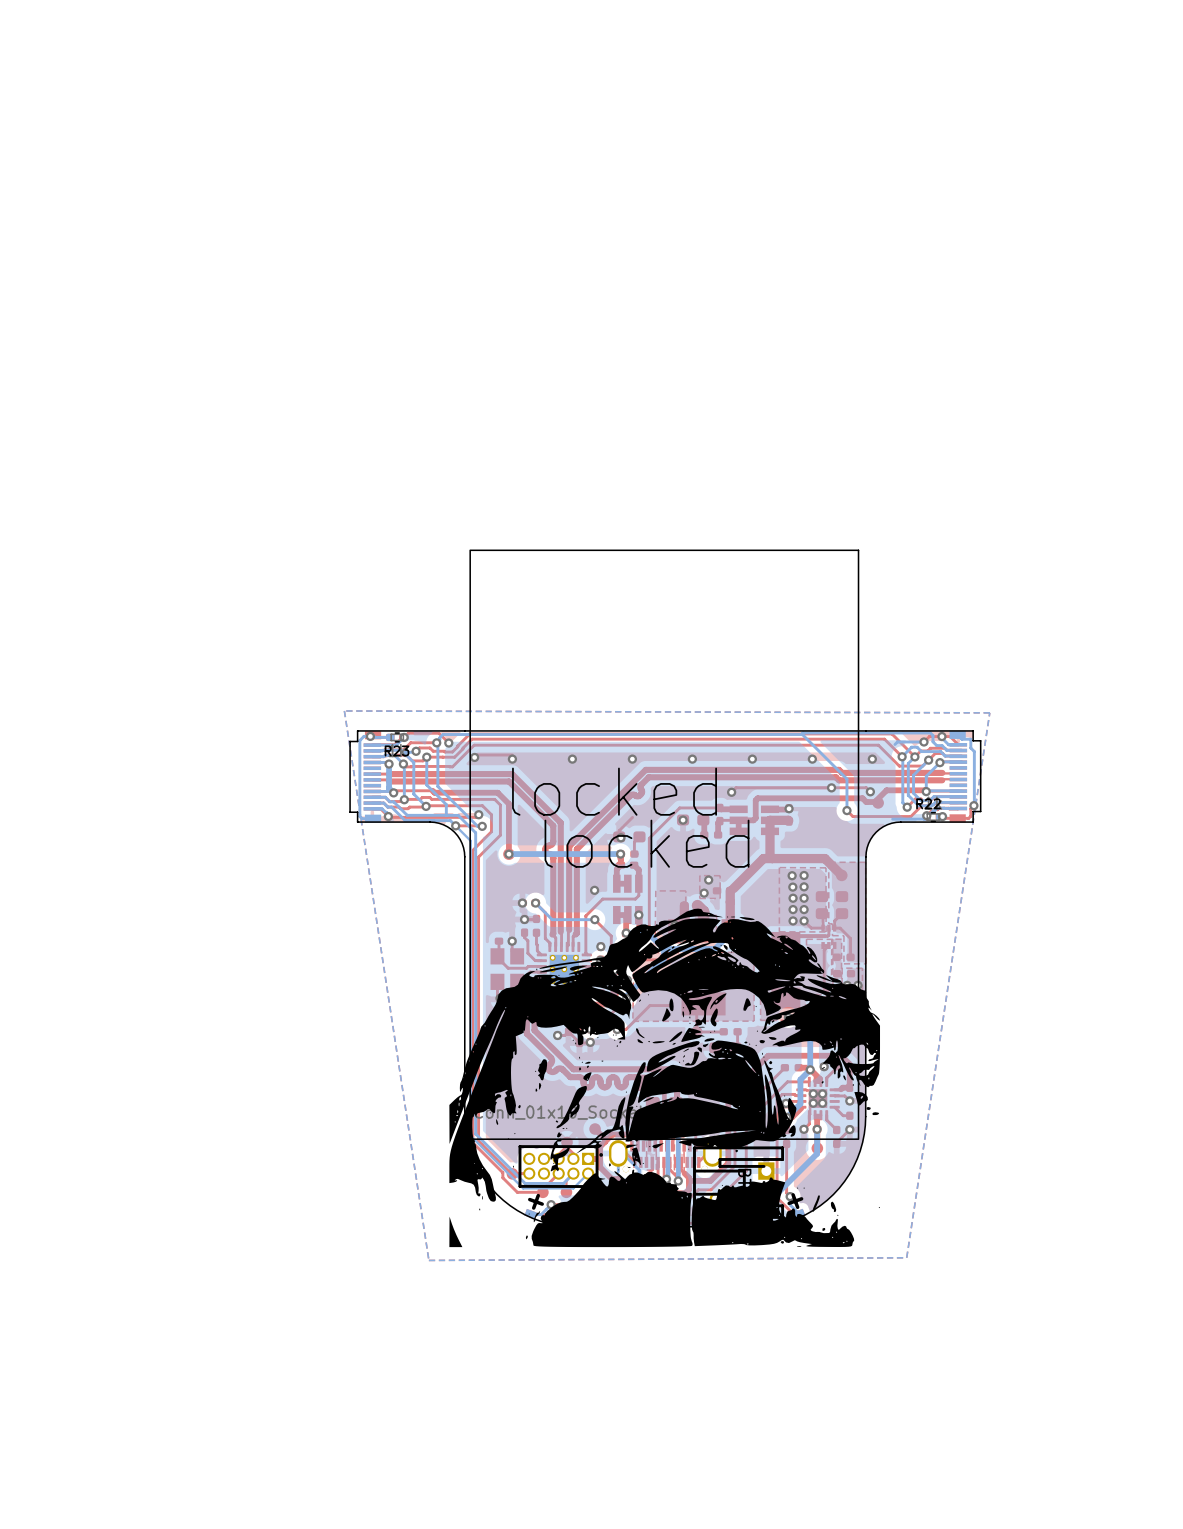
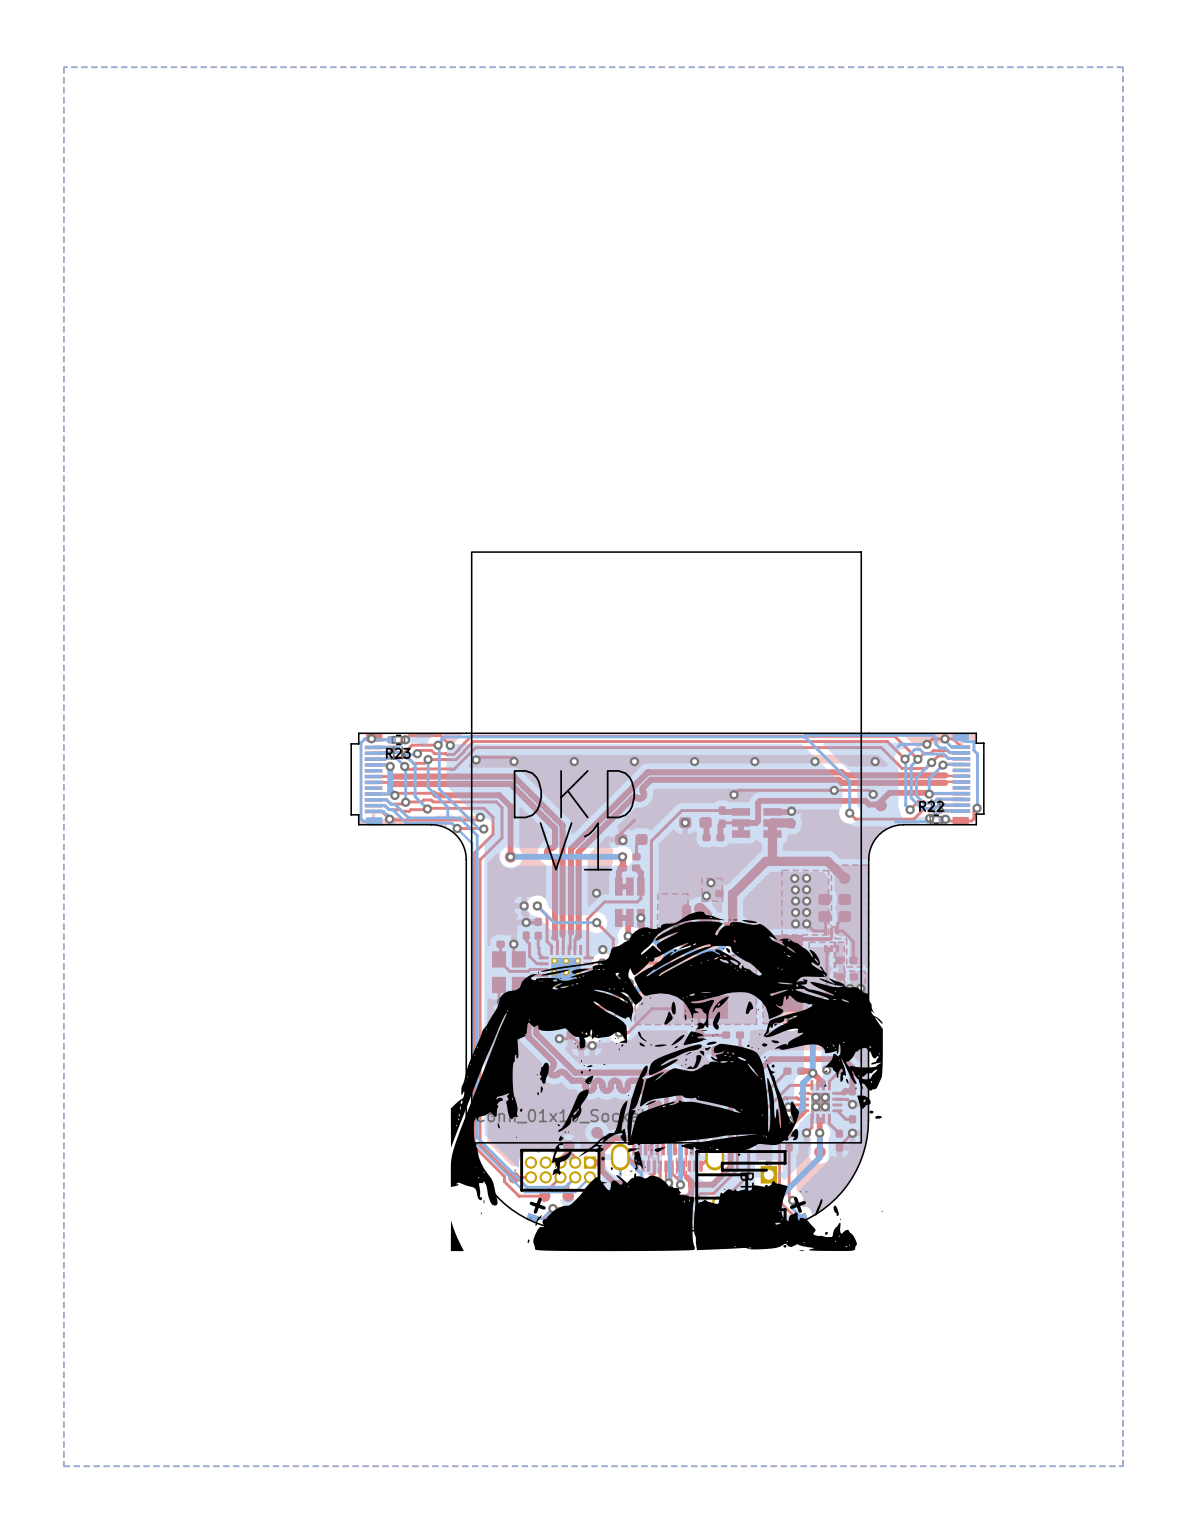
bottom zone outline: none -> (1123, 67) (1123, 1466) (63, 1466) (63, 67) (1123, 67)
bottom zone outline: (344, 710) (989, 712) (906, 1257) (428, 1260) (344, 710) -> none
text: locked (614, 791) -> DKD (574, 794)
text: locked (646, 843) -> V1 (575, 846)

